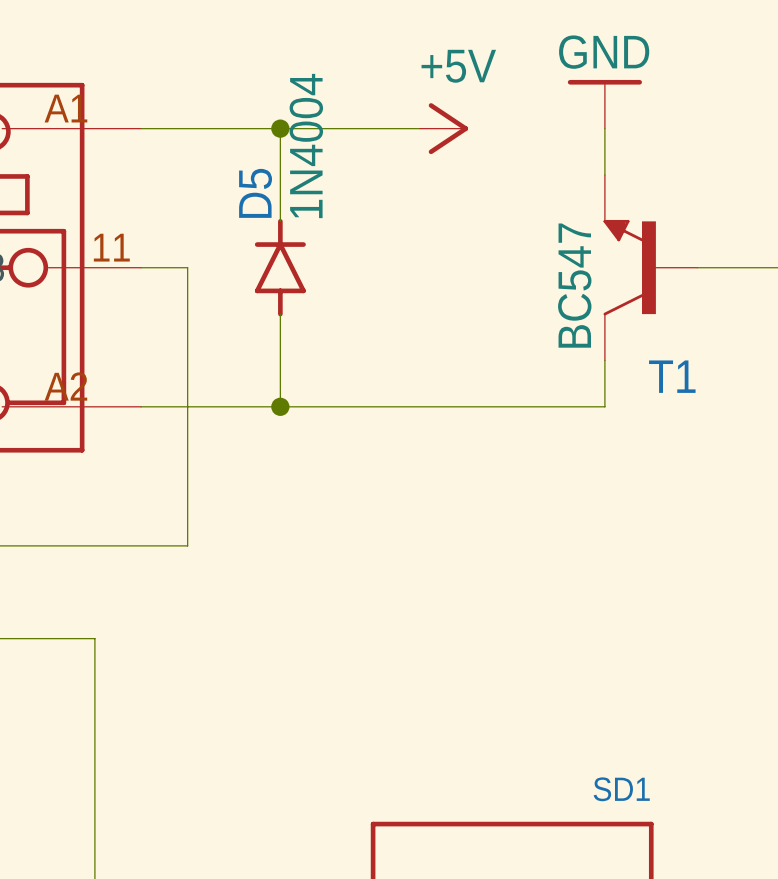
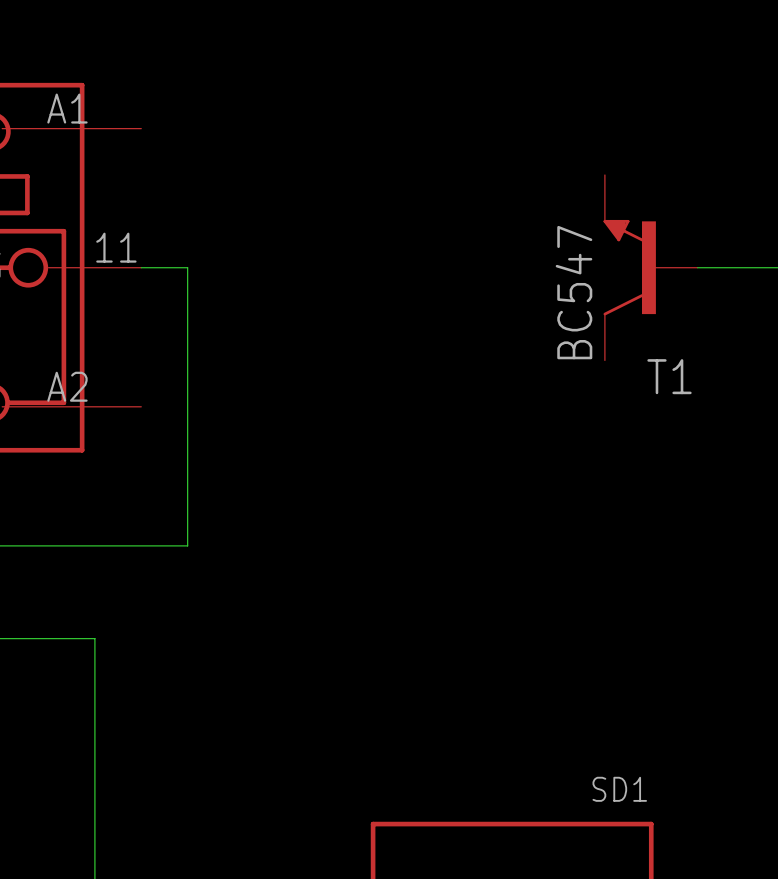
power symbol: GND (604, 104) -> none
wire: (141, 128) (419, 128) -> none
wire: (280, 128) (280, 221) -> none
junction: (280, 128) -> none
power symbol: +5V (443, 128) -> none
wire: (604, 128) (604, 174) -> none
D5: 1N4004 (280, 267) -> none
wire: (280, 314) (280, 406) -> none
wire: (604, 360) (604, 406) (141, 406) -> none
junction: (280, 406) -> none

